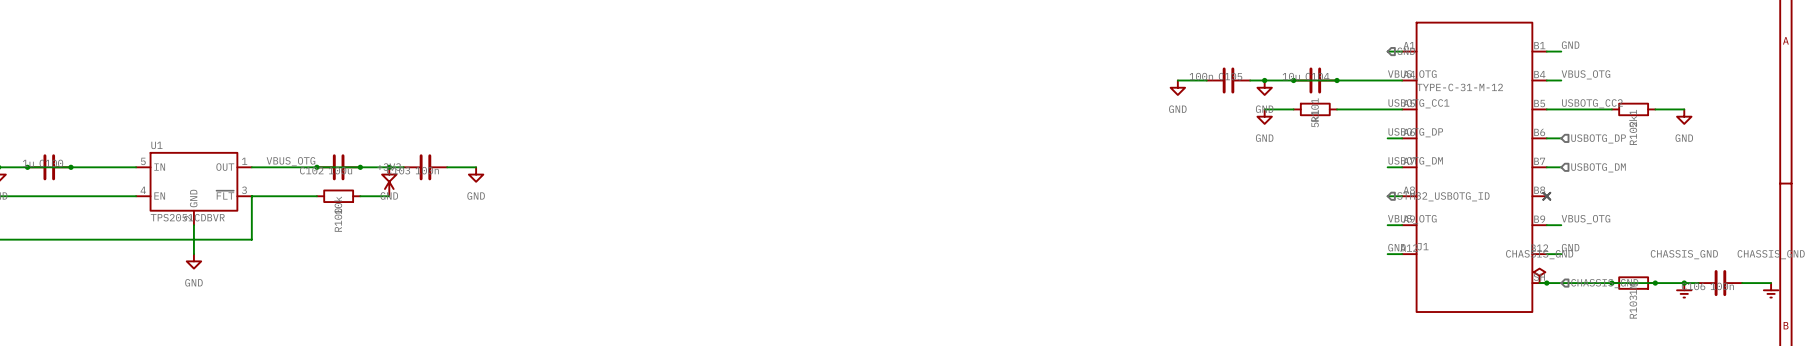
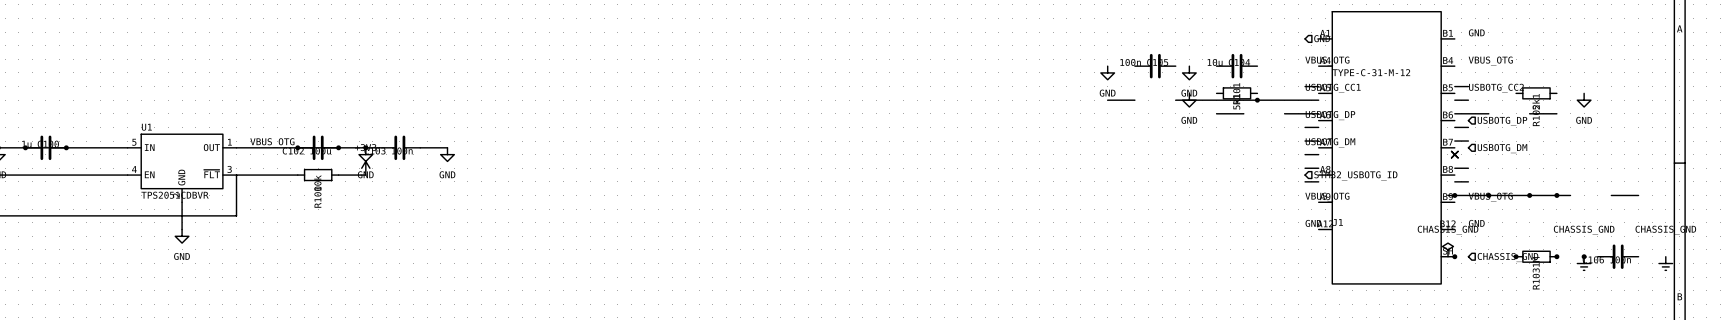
wire: (1387, 51) (1402, 51) -> (1305, 86) (1318, 86)
wire: (1546, 51) (1561, 51) -> (1454, 141) (1468, 141)
wire: (1177, 80) (1206, 80) -> (1107, 100) (1134, 100)
wire: (1250, 80) (1402, 80) -> (1175, 100) (1318, 100)
junction: (1264, 80) -> none
junction: (1293, 80) -> none
junction: (1337, 80) -> none
wire: (1546, 80) (1561, 80) -> (1454, 86) (1468, 86)
wire: (1264, 109) (1293, 109) -> (1216, 113) (1243, 113)
wire: (1337, 109) (1402, 109) -> none
wire: (1546, 109) (1611, 109) -> none
wire: (1655, 109) (1684, 109) -> (1529, 113) (1556, 113)
junction: none -> (1257, 100)
wire: none -> (1284, 113) (1318, 113)
wire: none -> (1454, 113) (1488, 113)
wire: (1387, 138) (1402, 138) -> (1305, 141) (1318, 141)
wire: (1546, 138) (1561, 138) -> (1454, 100) (1468, 100)
wire: (1387, 167) (1402, 167) -> (1305, 127) (1318, 127)
wire: (1546, 167) (1561, 167) -> (1454, 127) (1468, 127)
wire: (1387, 196) (1402, 196) -> (1305, 154) (1318, 154)
no-connect mark position: (1546, 196) -> (1454, 154)
wire: none -> (1447, 195) (1570, 195)
junction: none -> (1454, 195)
junction: none -> (1488, 195)
junction: none -> (1529, 195)
junction: none -> (1556, 195)
wire: (1387, 225) (1402, 225) -> (1305, 181) (1318, 181)
wire: (1546, 225) (1561, 225) -> (1454, 181) (1468, 181)
wire: (1387, 254) (1402, 254) -> (1305, 168) (1318, 168)
wire: (1546, 254) (1561, 254) -> (1454, 168) (1468, 168)
wire: (1539, 283) (1698, 283) -> none
wire: (1742, 283) (1771, 283) -> (1611, 195) (1638, 195)

